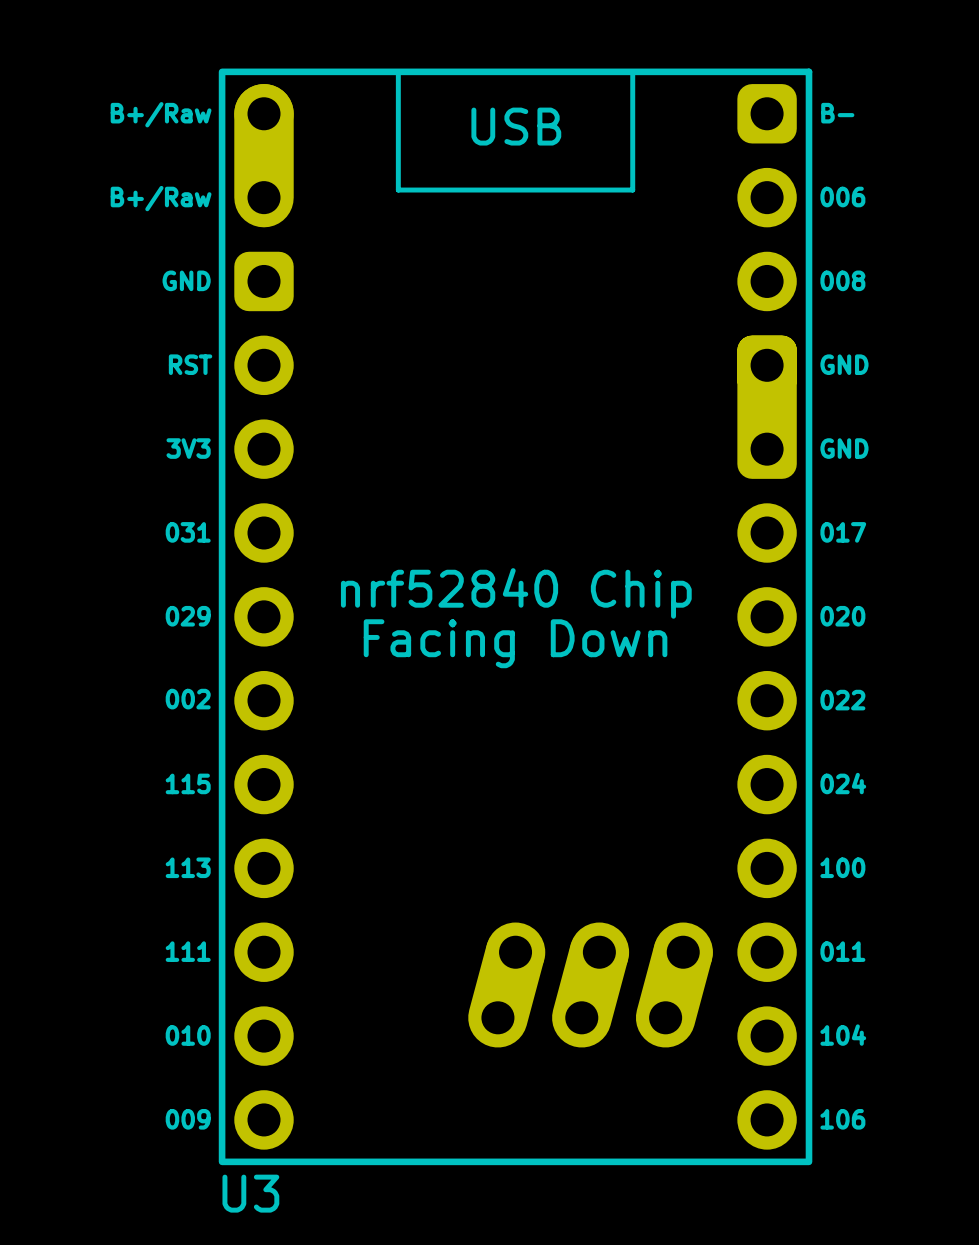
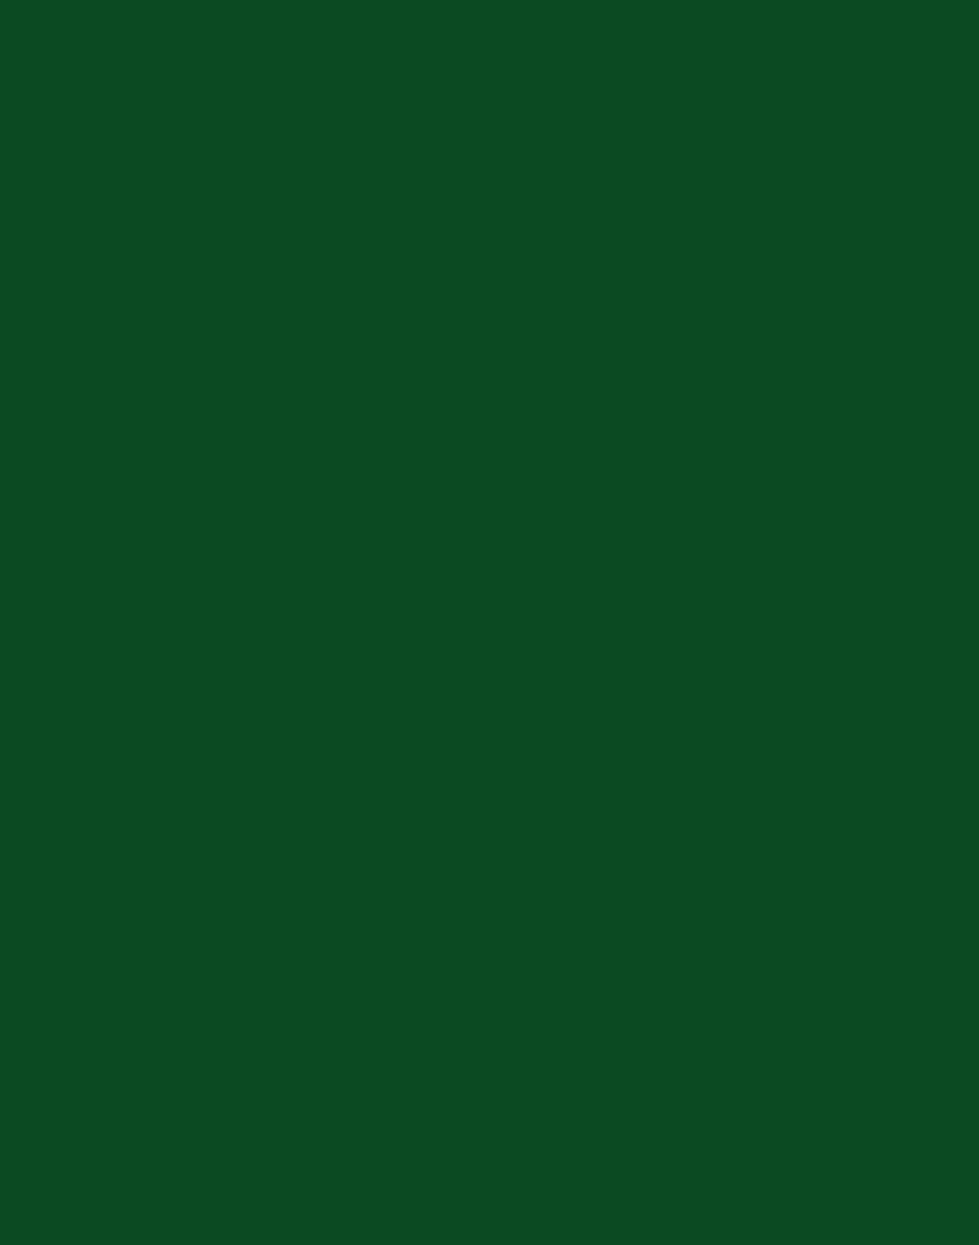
U3: (515, 616) -> none

